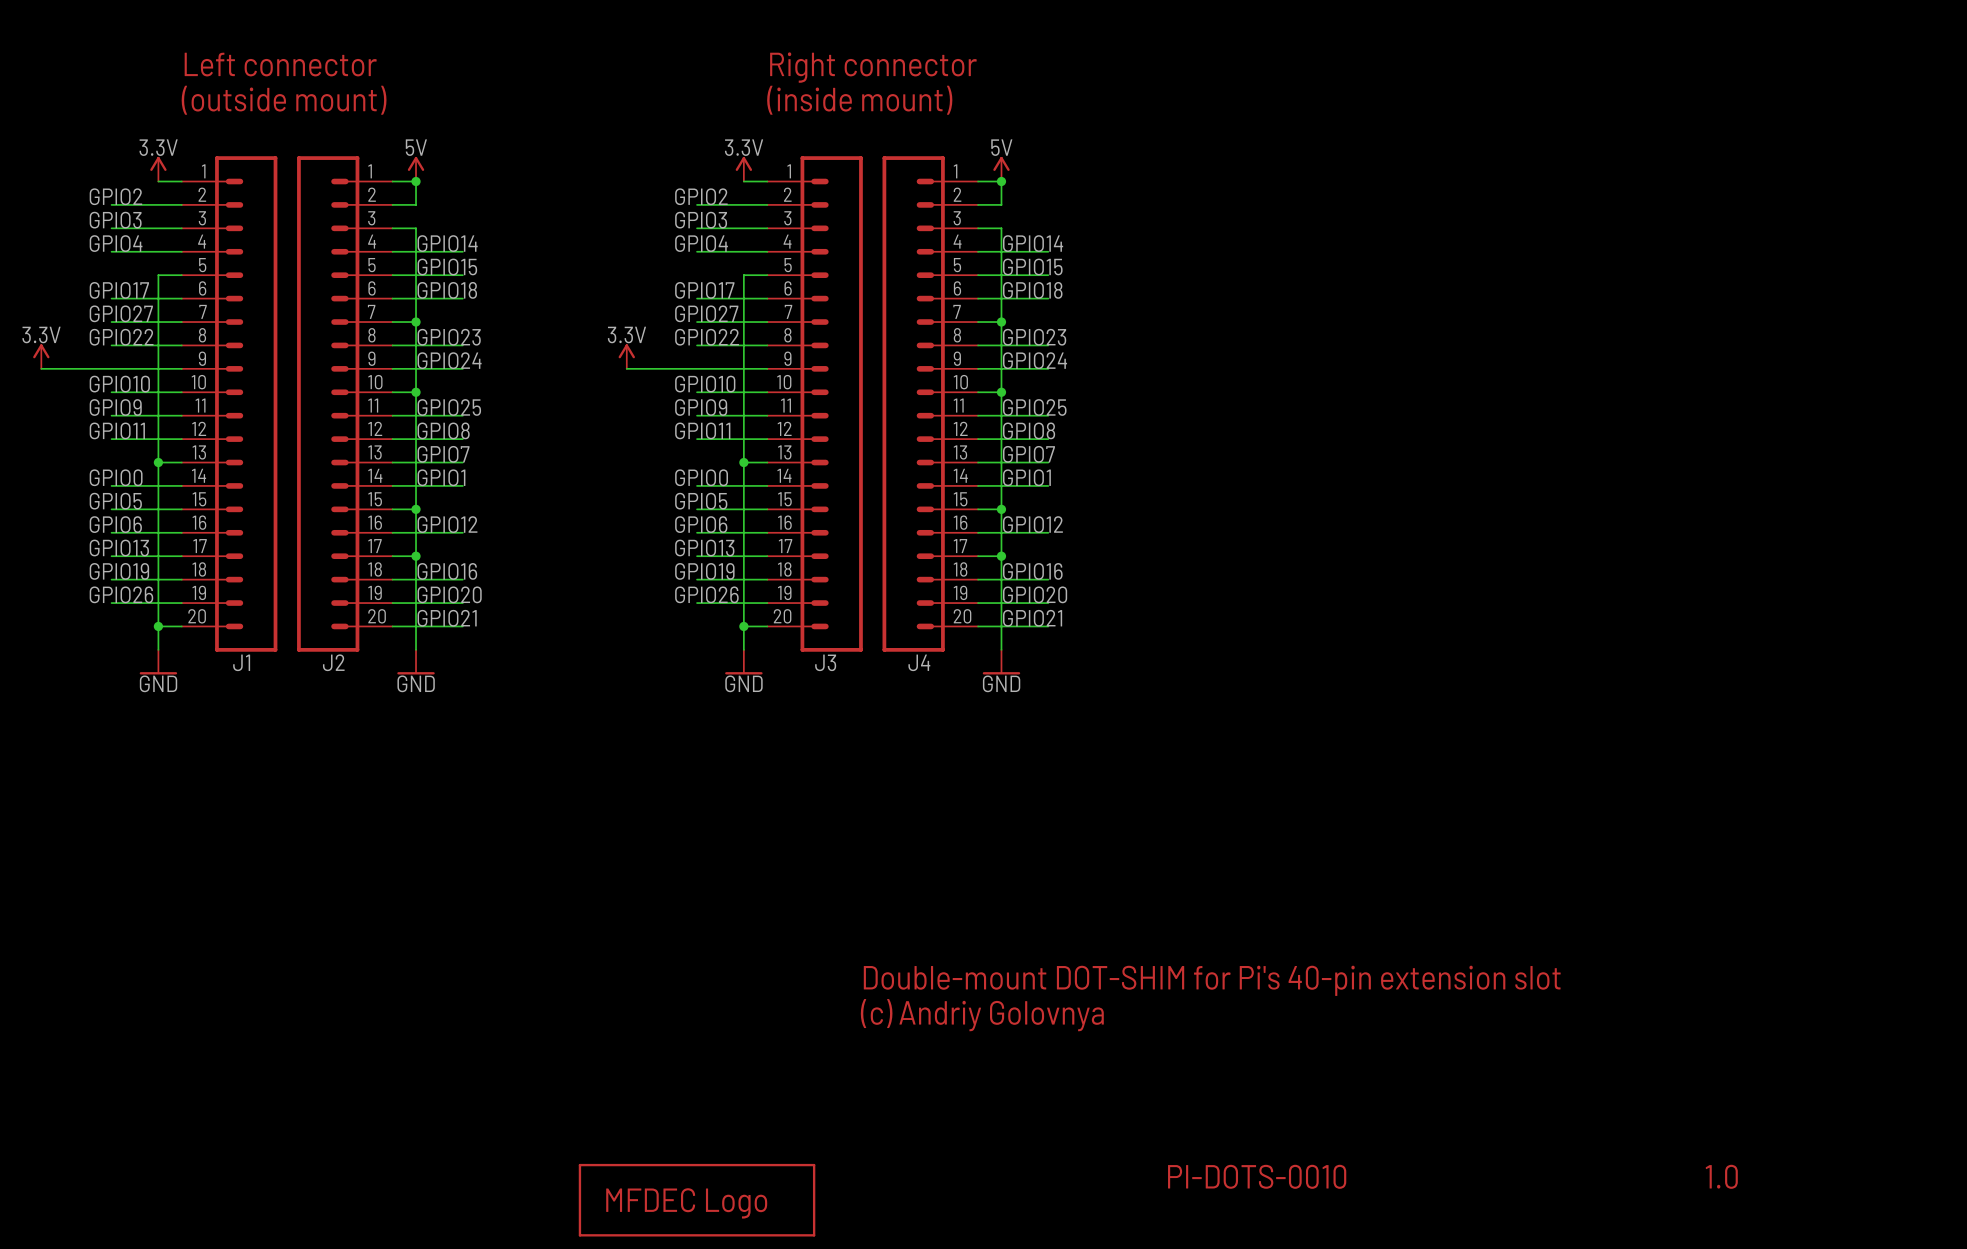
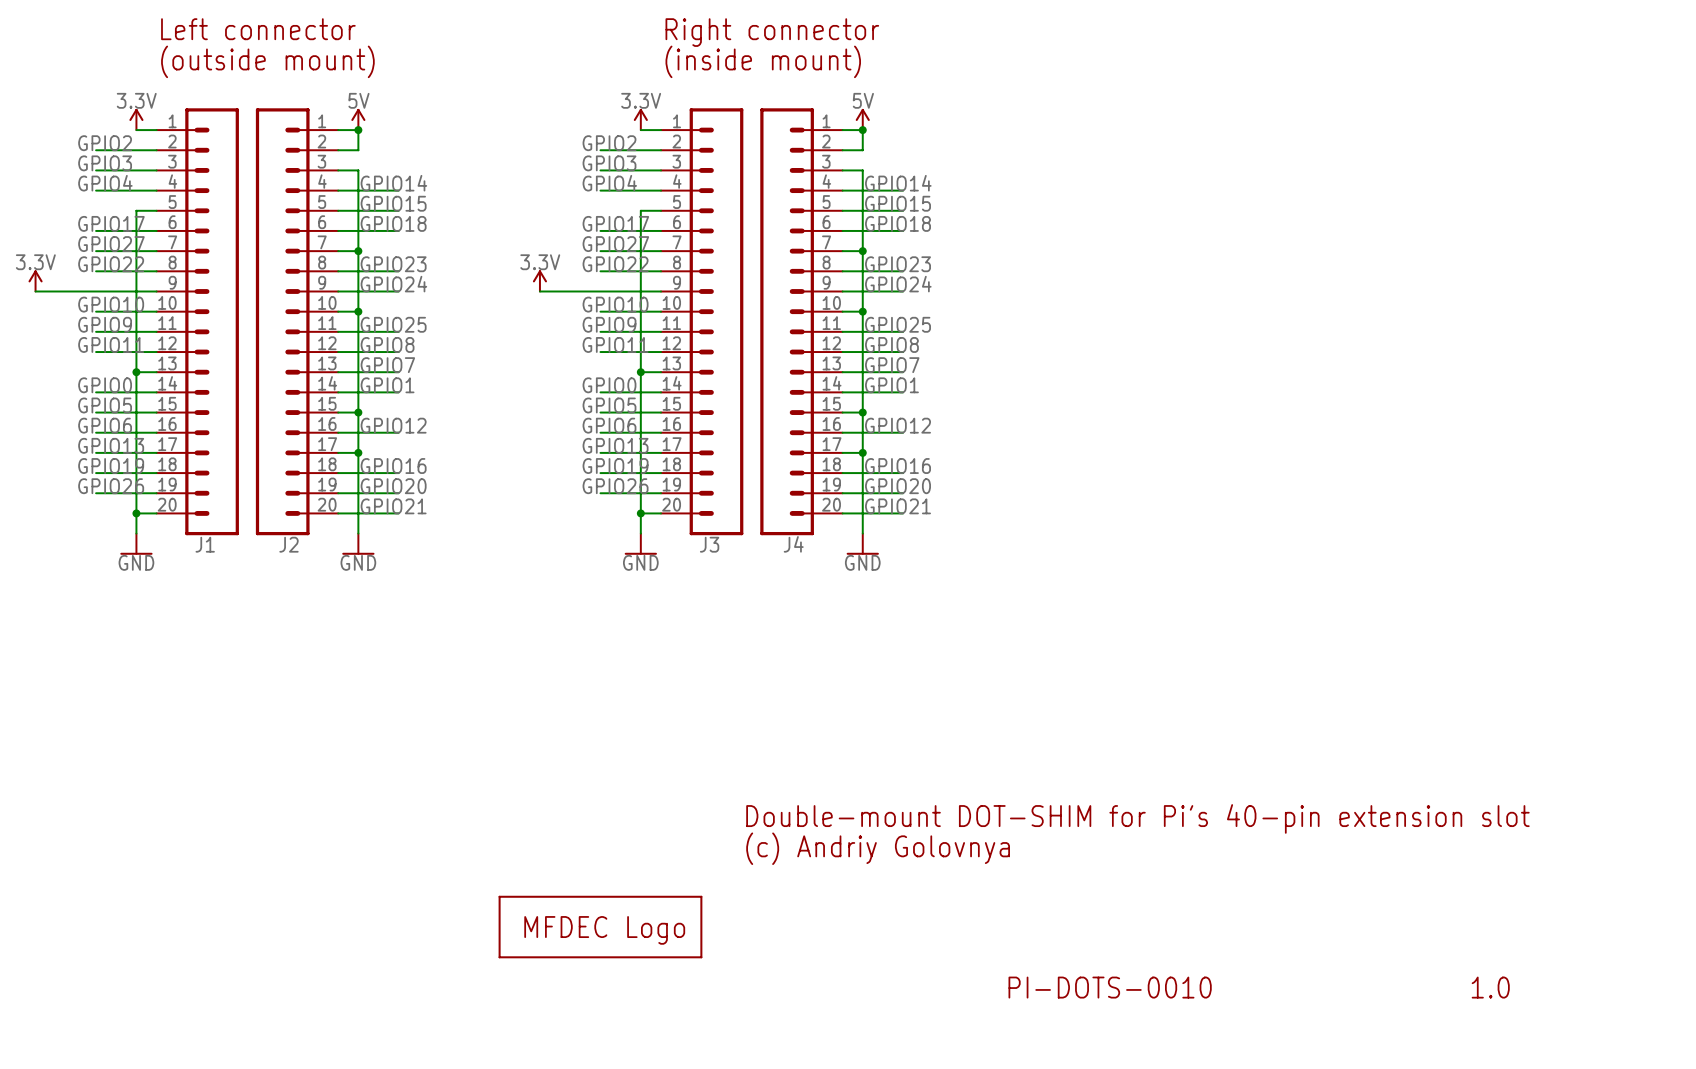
part position: (697, 1200) -> (600, 927)

